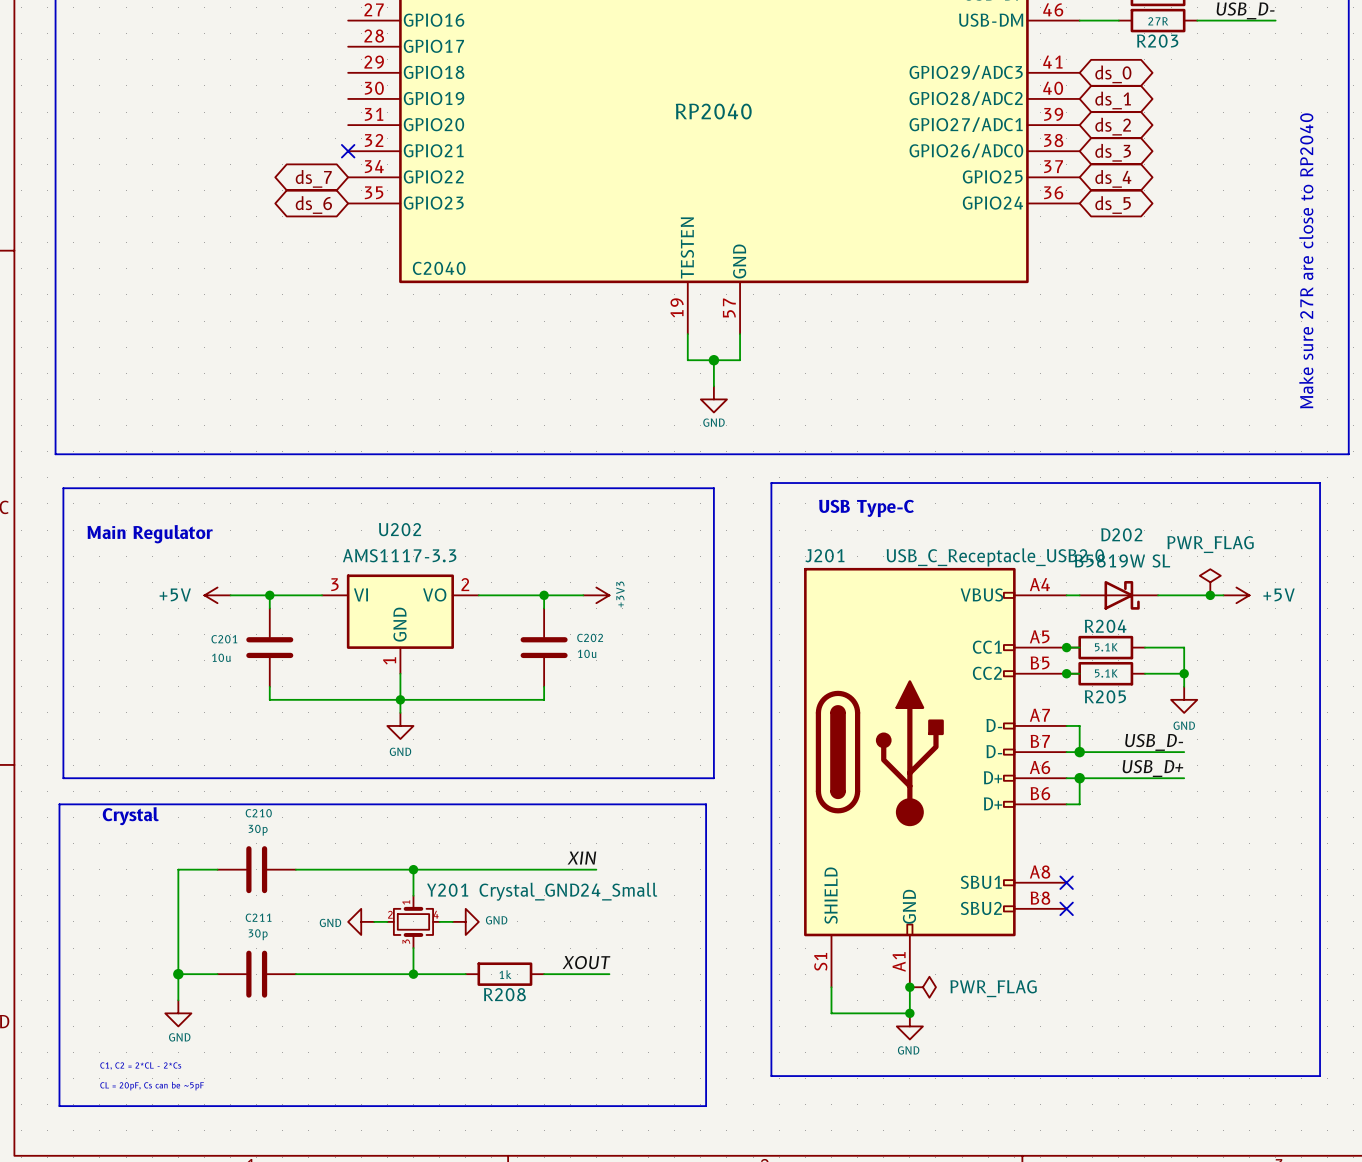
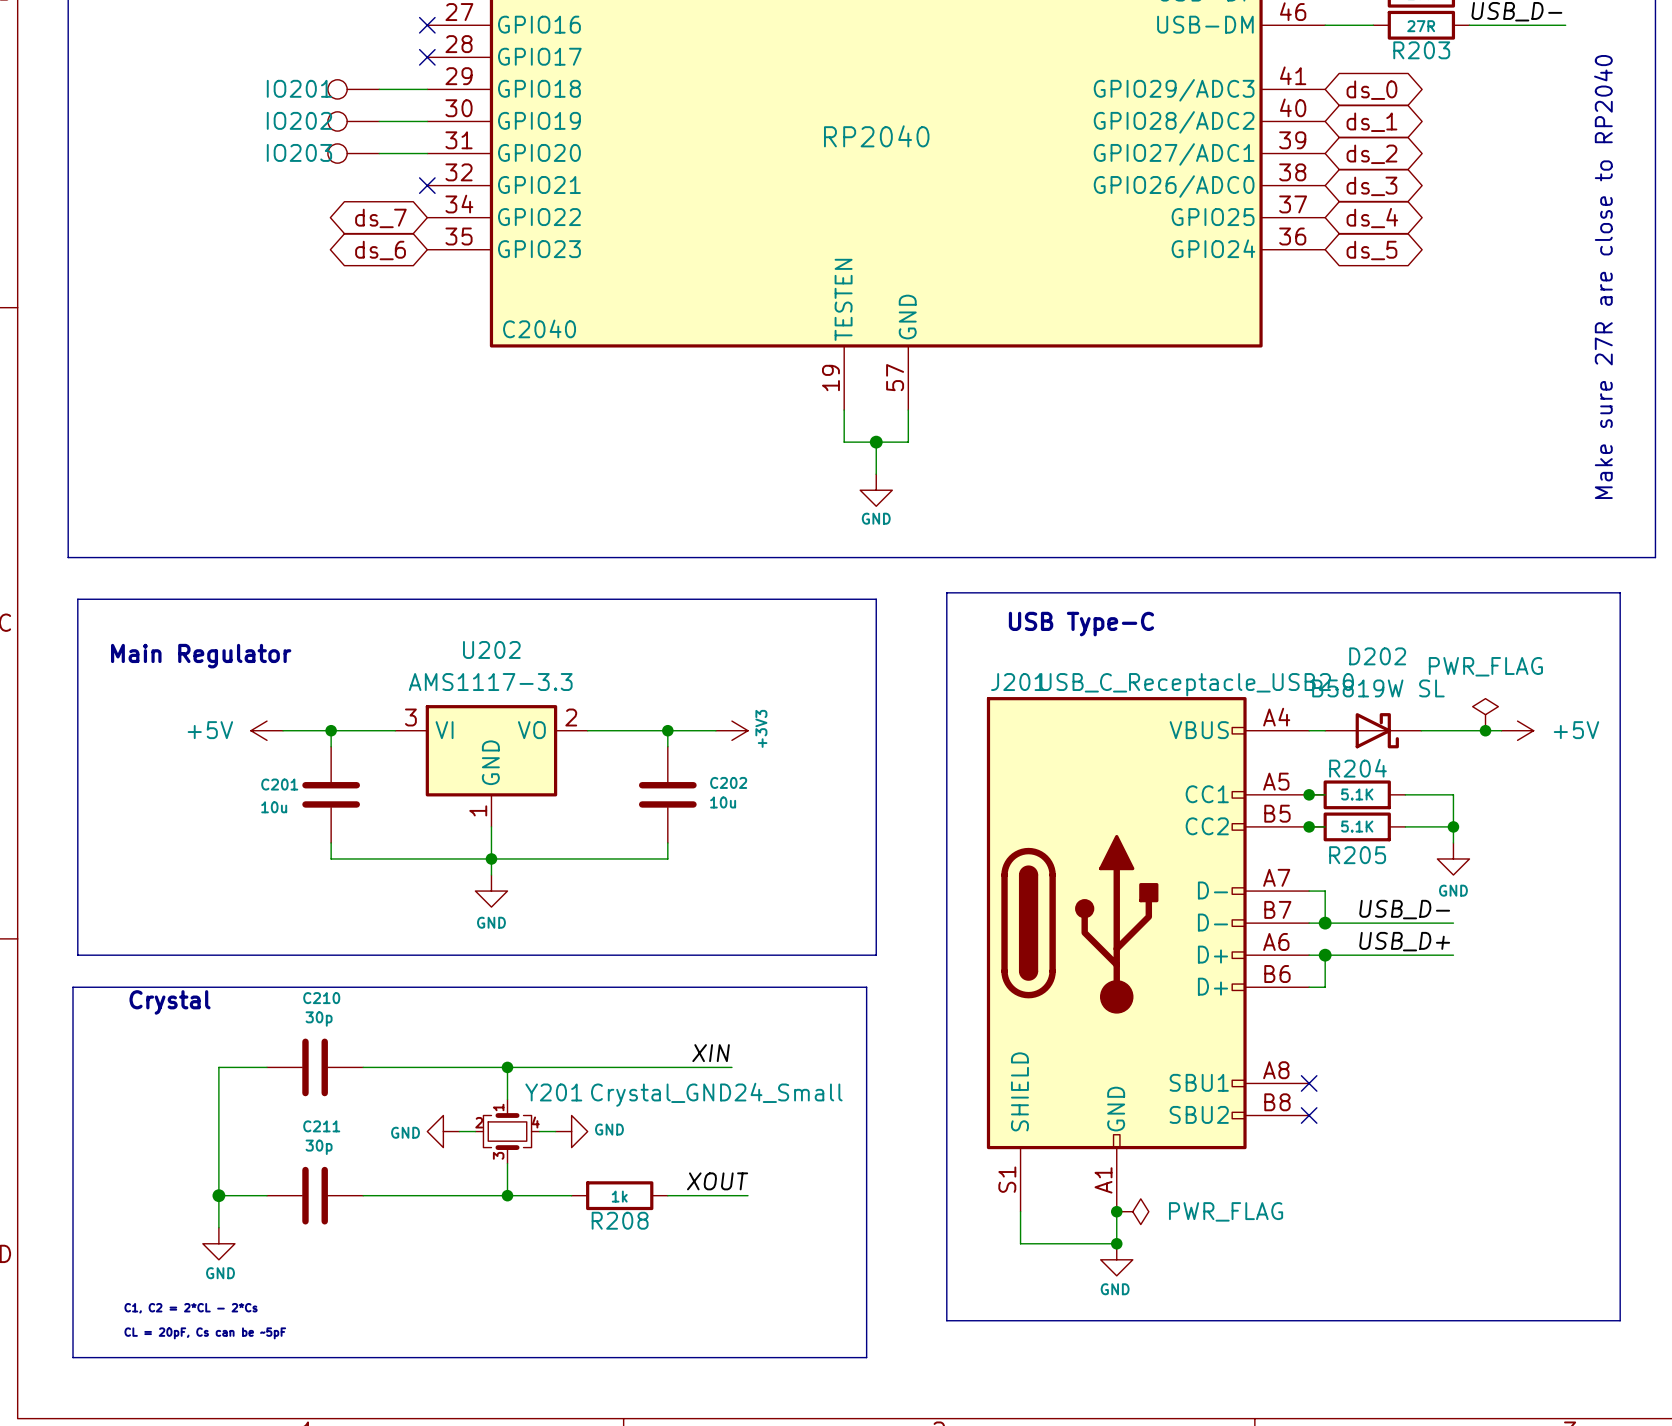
no-connect mark: none -> (427, 25)
no-connect mark: none -> (427, 57)
IO201: none -> (353, 89)
wire: none -> (379, 89) (427, 89)
IO202: none -> (353, 121)
wire: none -> (379, 121) (427, 121)
IO203: none -> (353, 153)
wire: none -> (379, 153) (427, 153)

